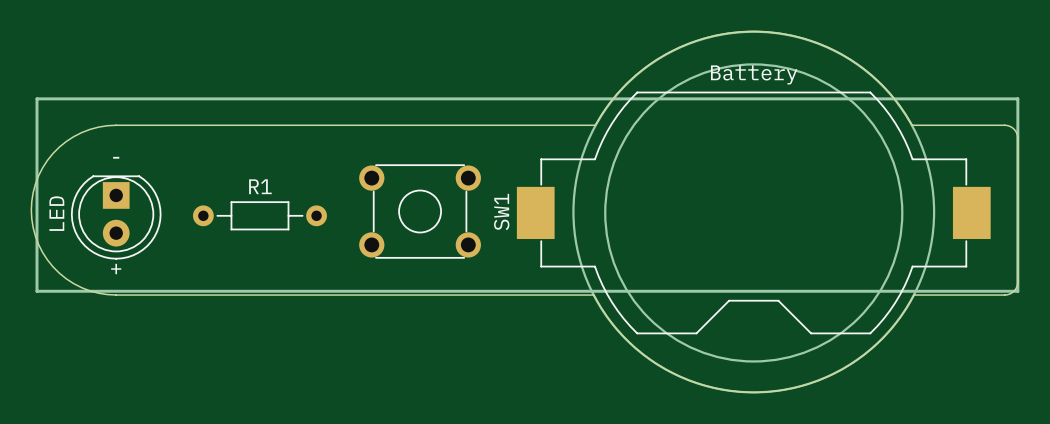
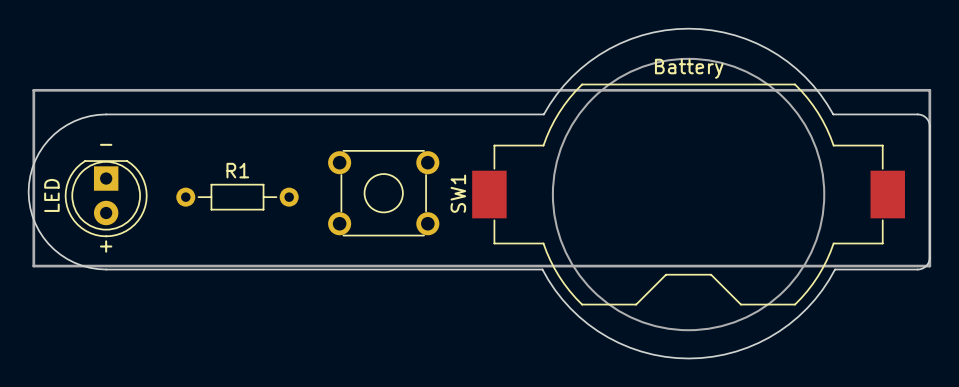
drawing: [572, 30, 936, 394] -> none

